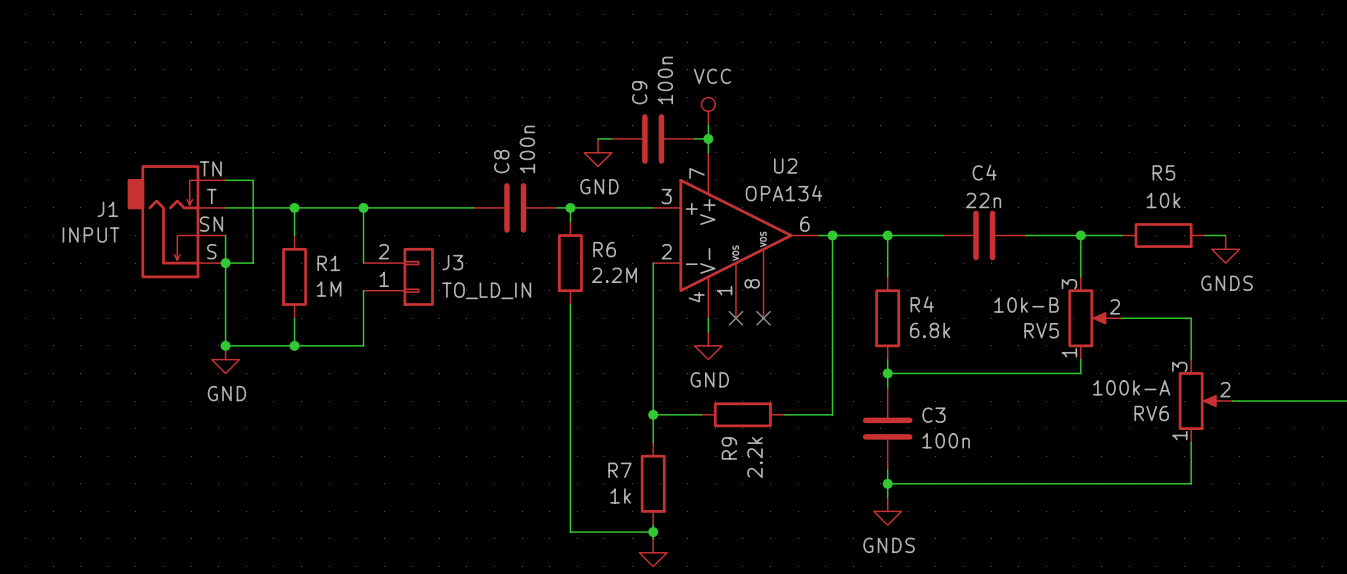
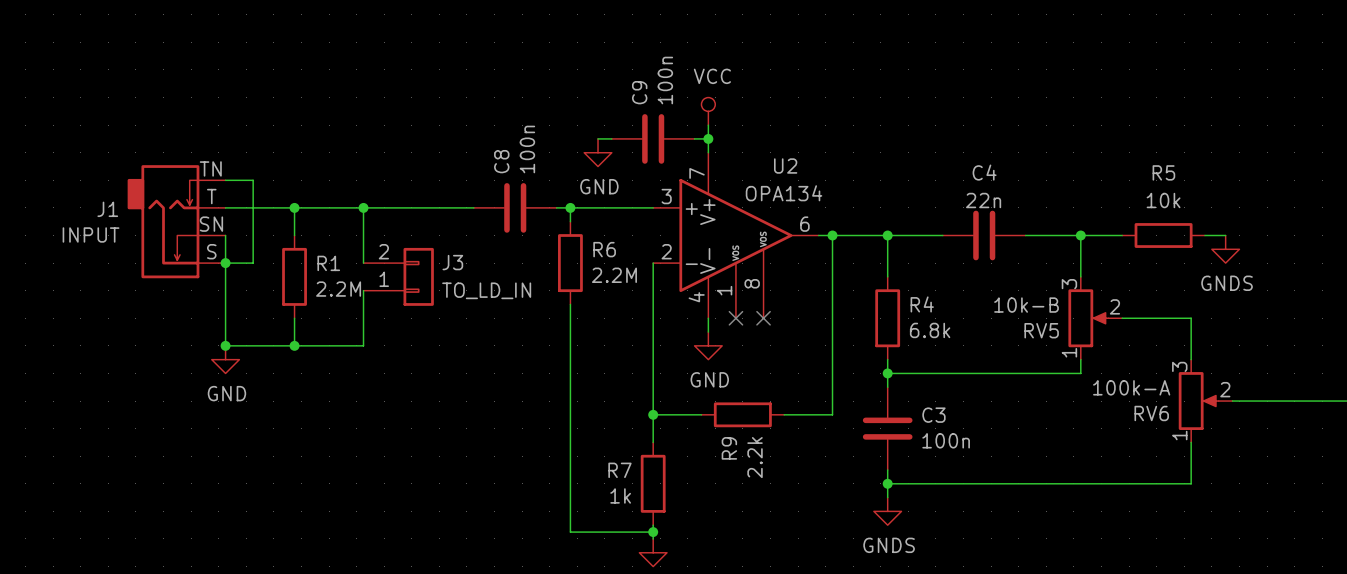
R1 value: 1M (329, 289) -> 2.2M (338, 289)

